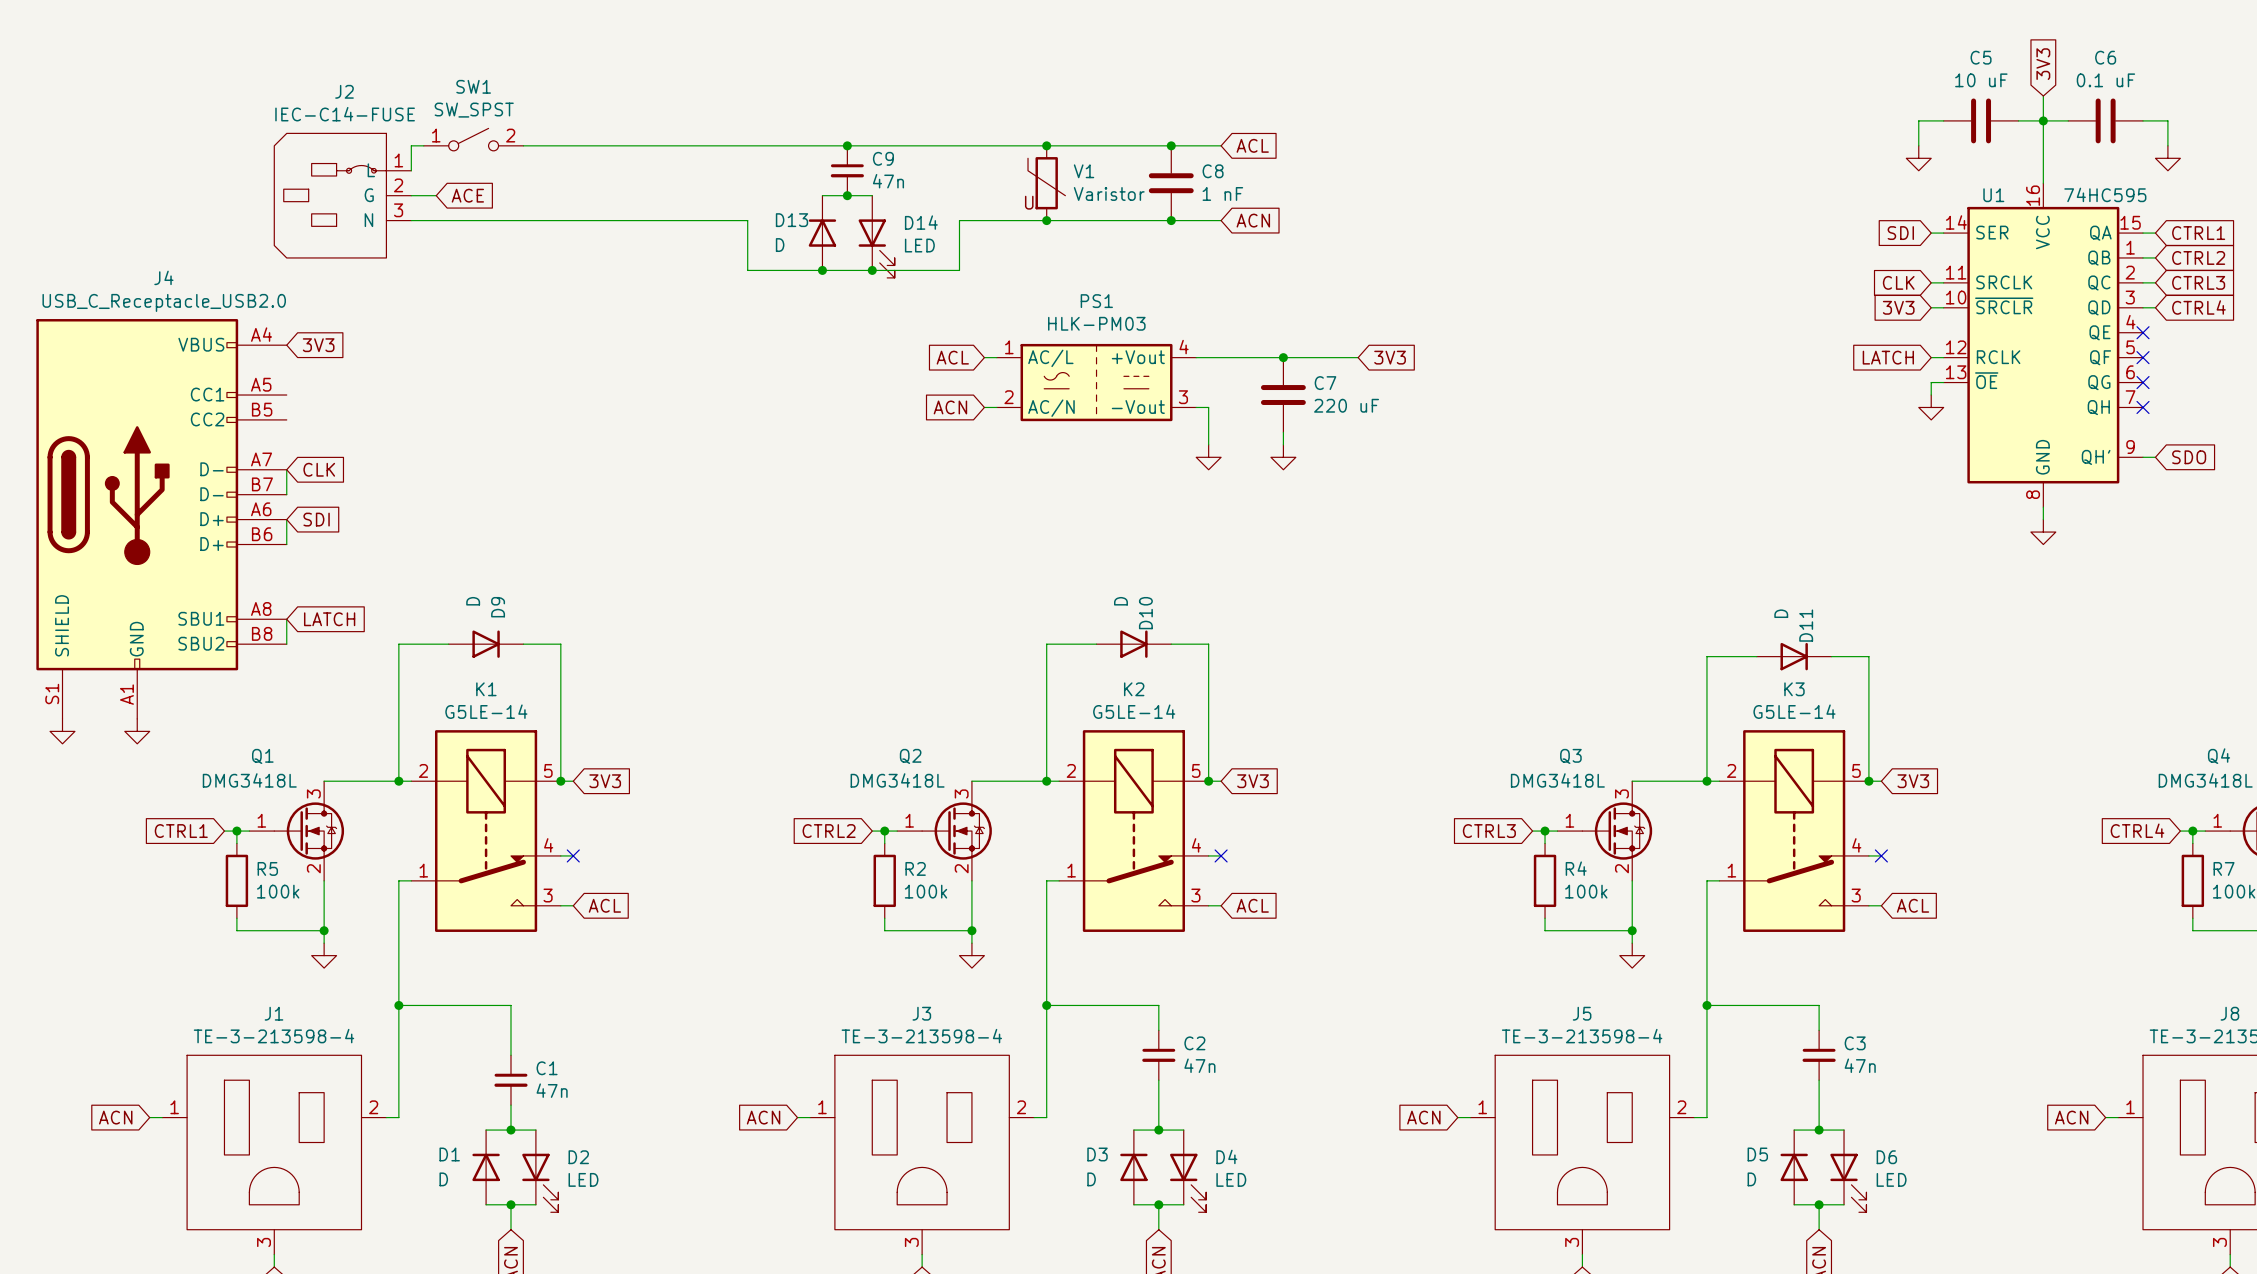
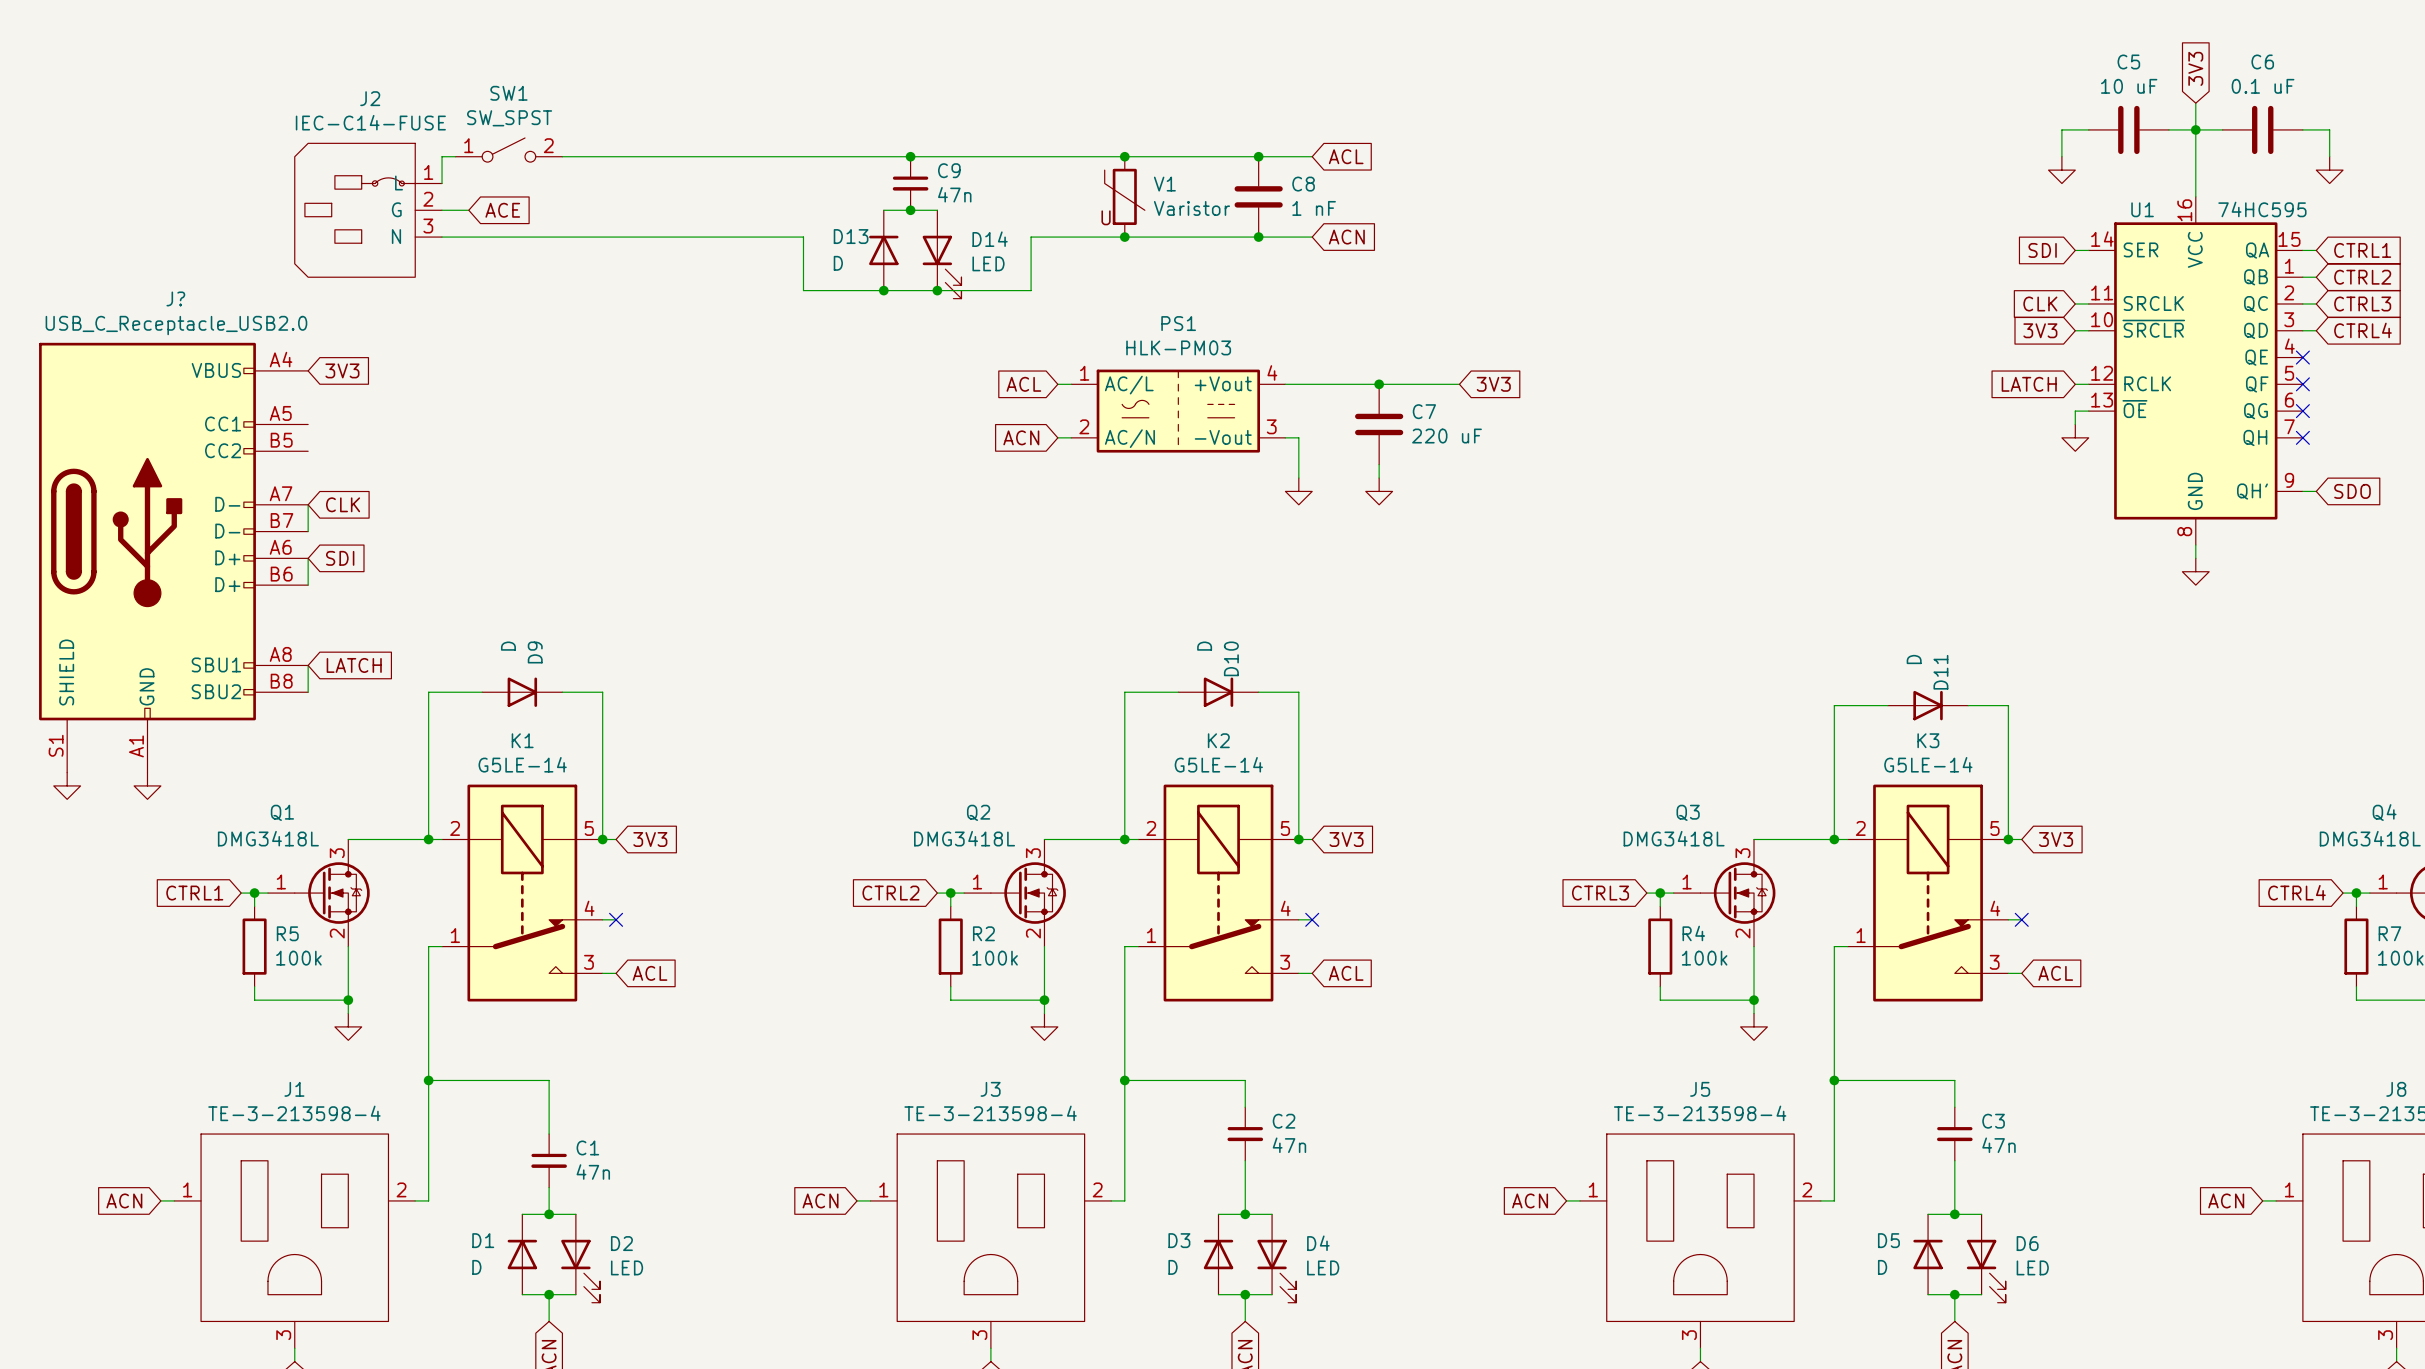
J4 name: J4 (163, 277) -> J? (175, 298)

